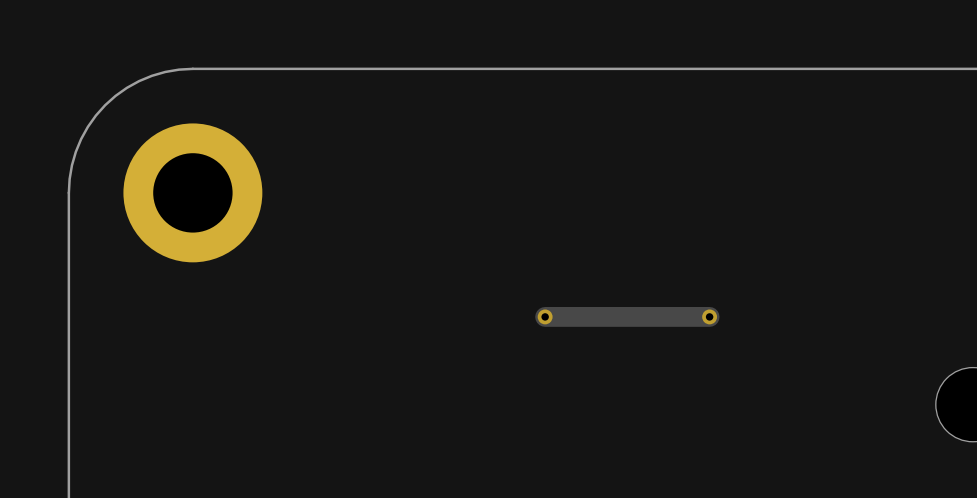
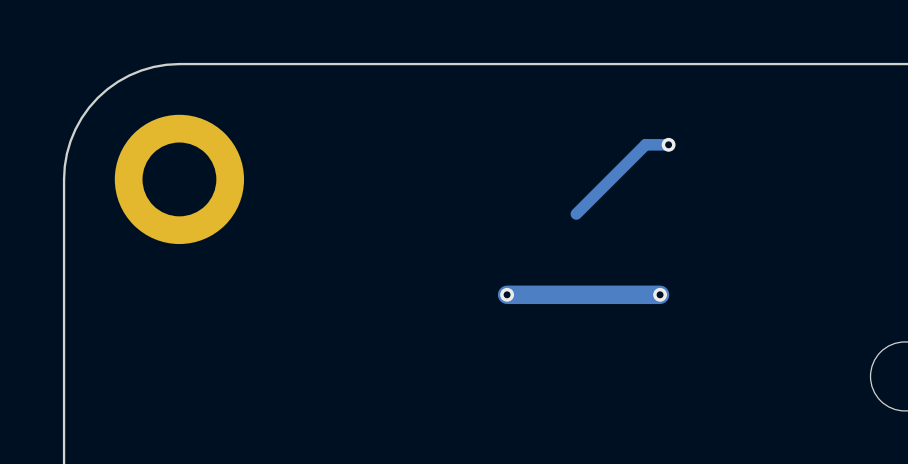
track: none -> (668, 144) (645, 144) (576, 214)
via: none -> (668, 144)

